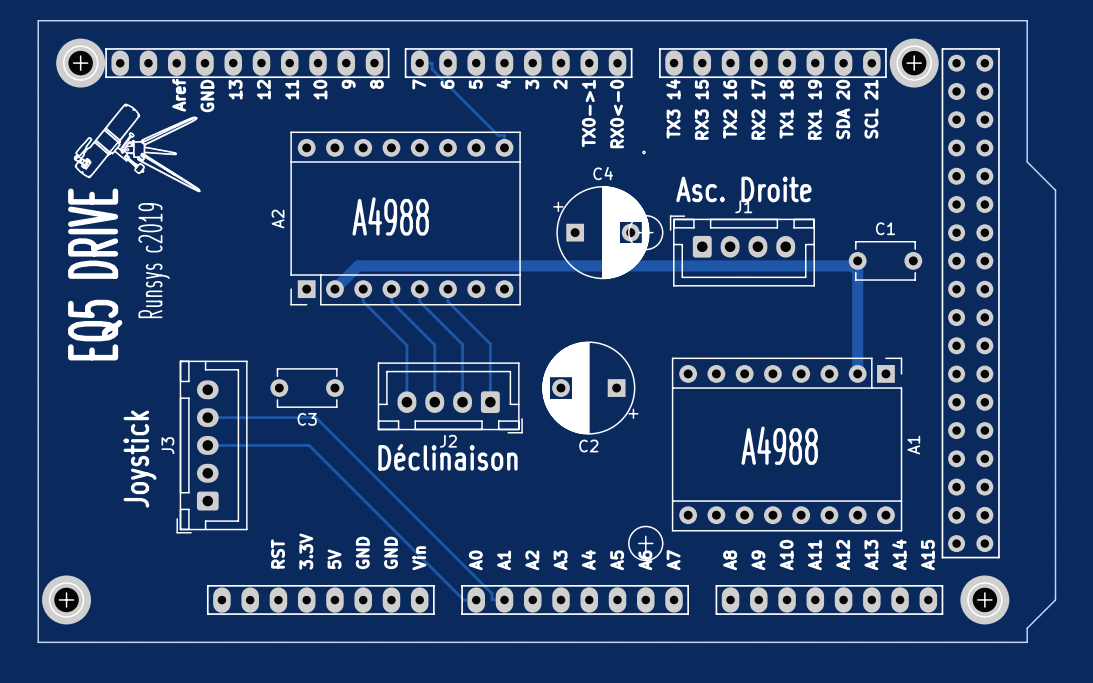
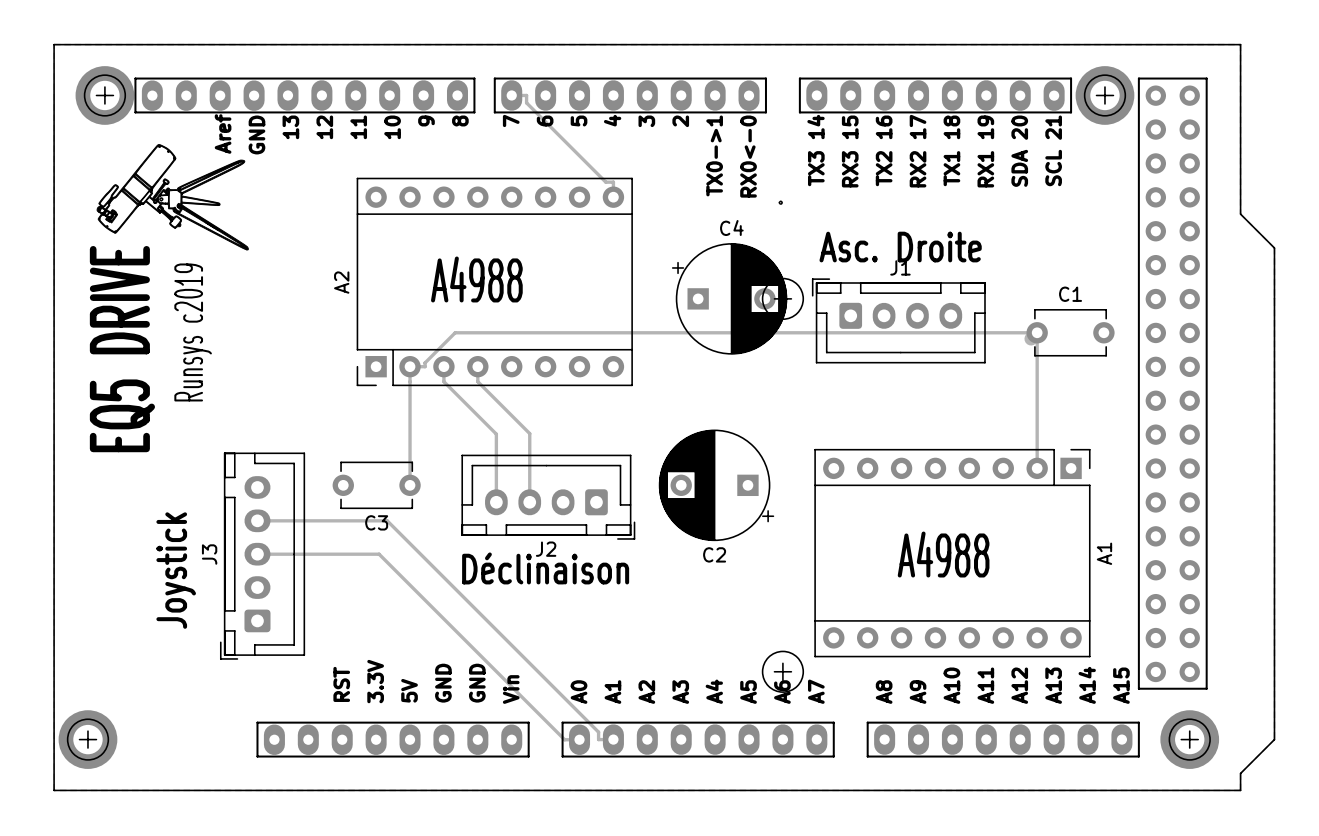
track: (857, 271) (852, 265) (358, 265) (334, 289) -> (1037, 344) (1037, 332) (455, 332) (425, 362) (425, 366) (410, 366) (410, 485)
track width: thick (857, 271) (857, 373) -> thin (1037, 344) (1037, 468)
track: (419, 289) (419, 301) (462, 344) (462, 402) -> none
track: (447, 289) (447, 301) (490, 344) (490, 402) -> none

